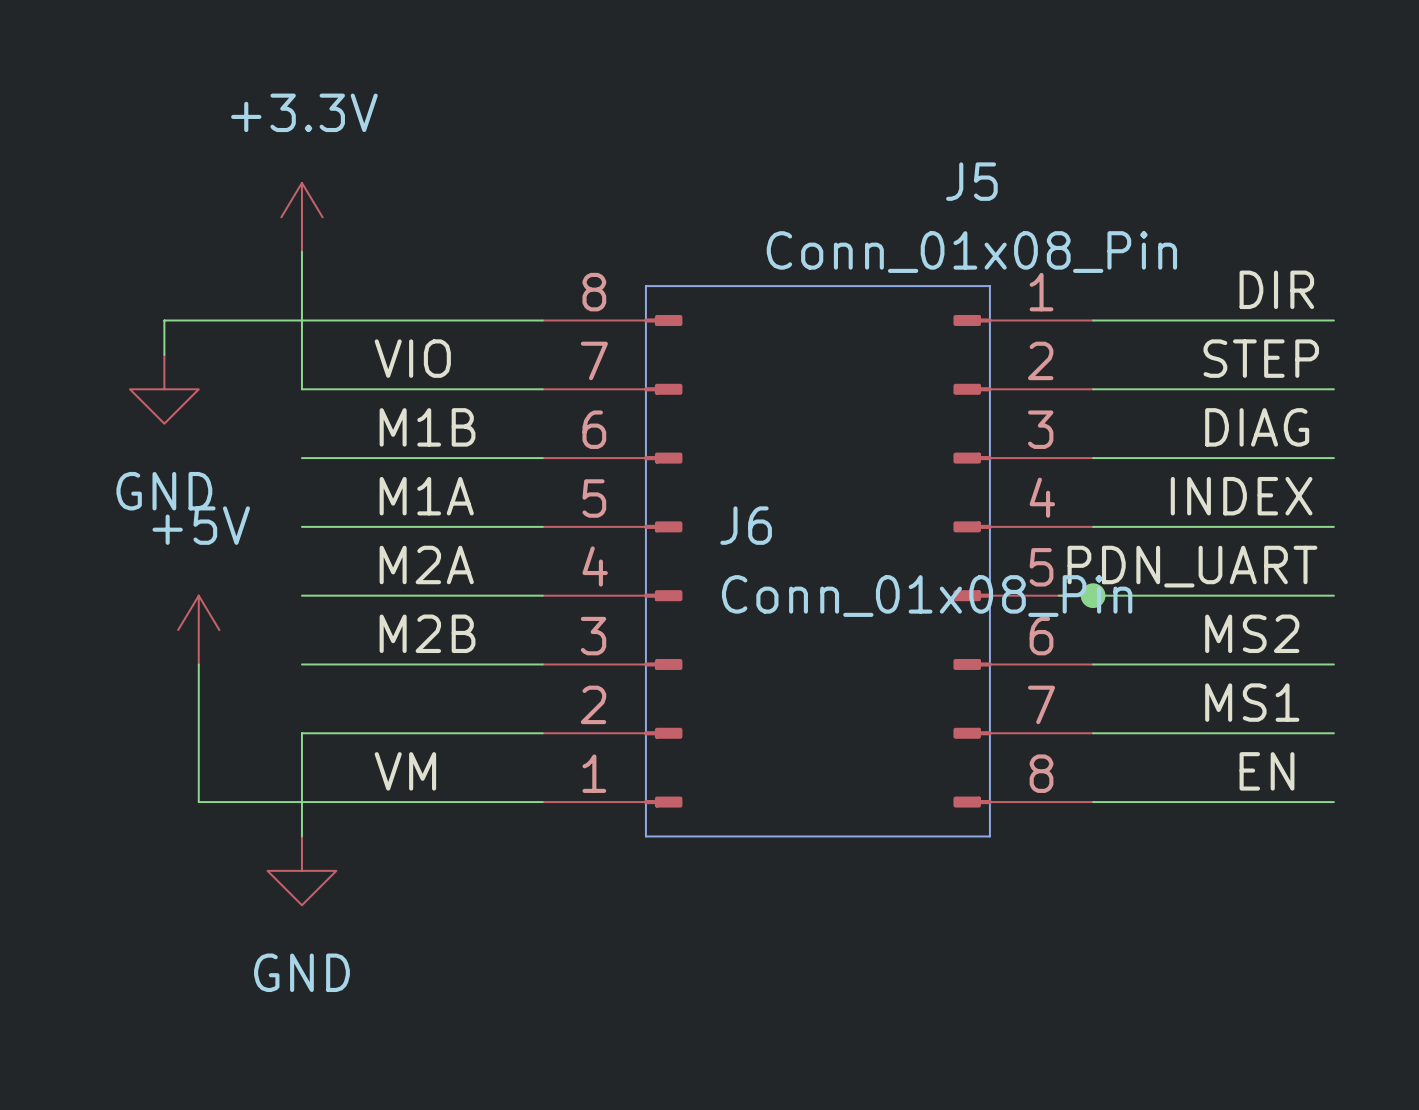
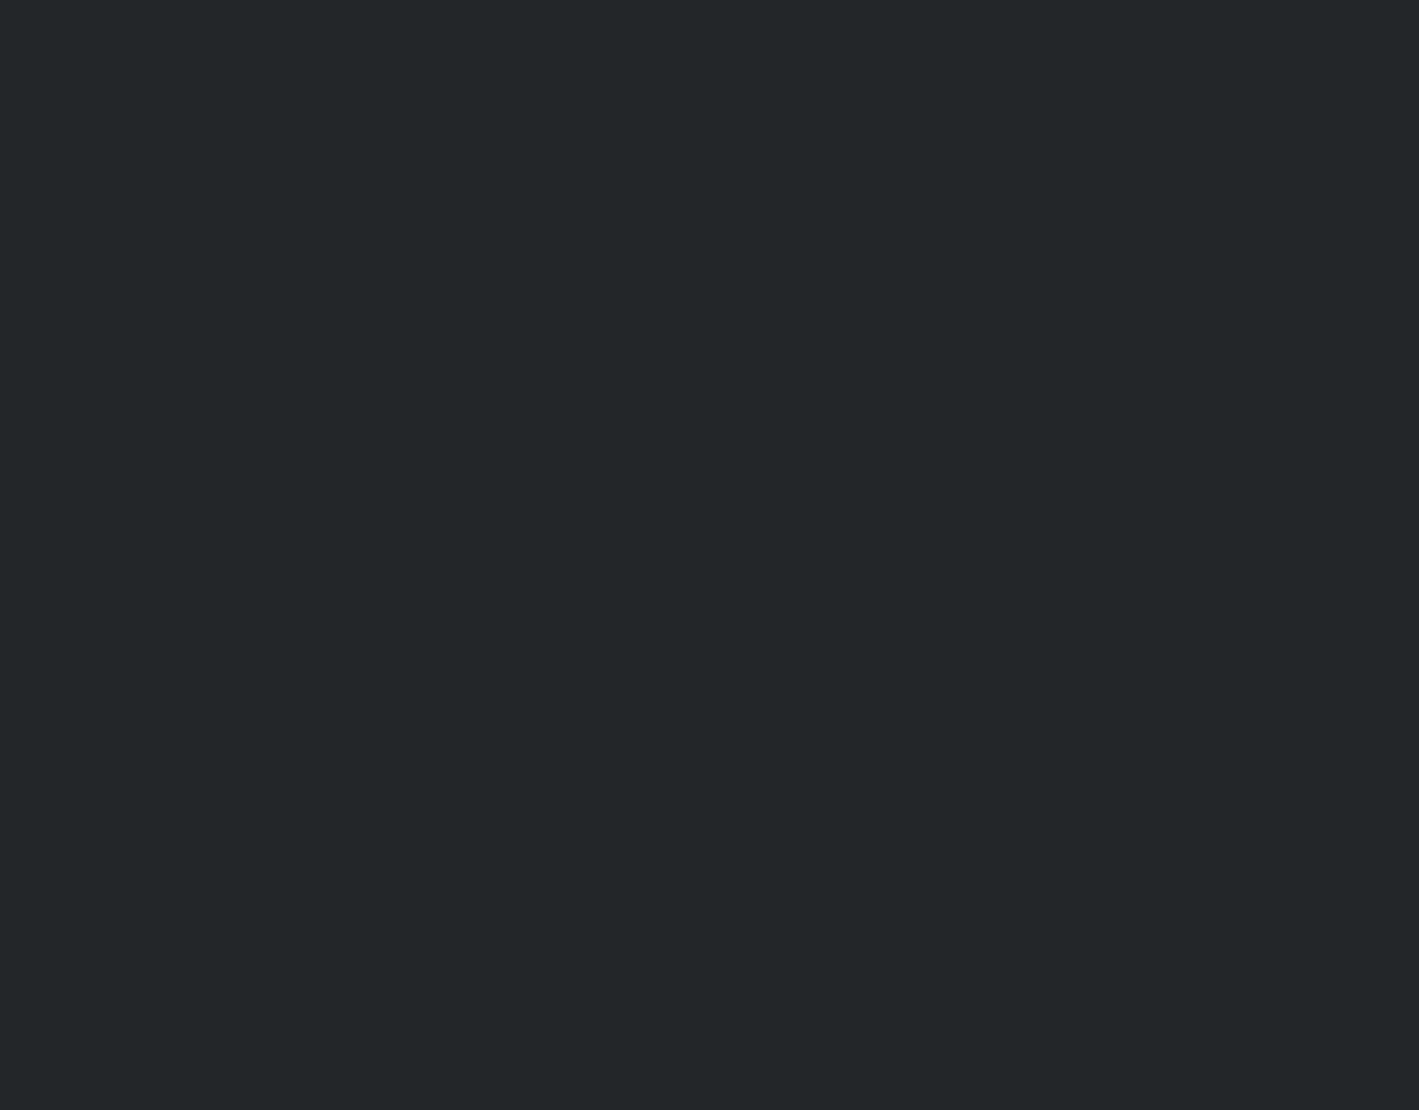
power symbol: +3.3V (301, 217) -> none
wire: (301, 251) (301, 389) (542, 389) -> none
line: (645, 286) (989, 286) (989, 836) (645, 836) (645, 286) -> none
label: DIR (1276, 289) -> none
wire: (542, 320) (164, 320) (164, 354) -> none
wire: (1093, 320) (1333, 320) -> none
label: VIO (412, 358) -> none
label: STEP (1261, 358) -> none
power symbol: GND (164, 389) -> none
wire: (1093, 389) (1333, 389) -> none
label: M1B (427, 427) -> none
label: DIAG (1257, 427) -> none
wire: (301, 458) (542, 458) -> none
wire: (1093, 458) (1333, 458) -> none
label: M1A (426, 496) -> none
label: INDEX (1241, 496) -> none
wire: (301, 526) (542, 526) -> none
wire: (1093, 526) (1333, 526) -> none
J6: Conn_01x08_Pin (612, 561) -> none
J5: Conn_01x08_Pin (1023, 561) -> none
label: M2A (426, 564) -> none
label: PDN_UART (1192, 566) -> none
wire: (301, 595) (542, 595) -> none
wire: (1058, 595) (1333, 595) -> none
junction: (1093, 595) -> none
power symbol: +5V (198, 630) -> none
label: M2B (427, 633) -> none
label: MS2 (1252, 633) -> none
wire: (198, 664) (198, 802) (542, 802) -> none
wire: (301, 664) (542, 664) -> none
wire: (1093, 664) (1333, 664) -> none
label: MS1 (1252, 702) -> none
wire: (542, 733) (301, 733) (301, 836) -> none
wire: (1093, 733) (1333, 733) -> none
label: VM (405, 771) -> none
label: EN (1267, 771) -> none
wire: (1093, 802) (1333, 802) -> none
power symbol: GND (301, 870) -> none

